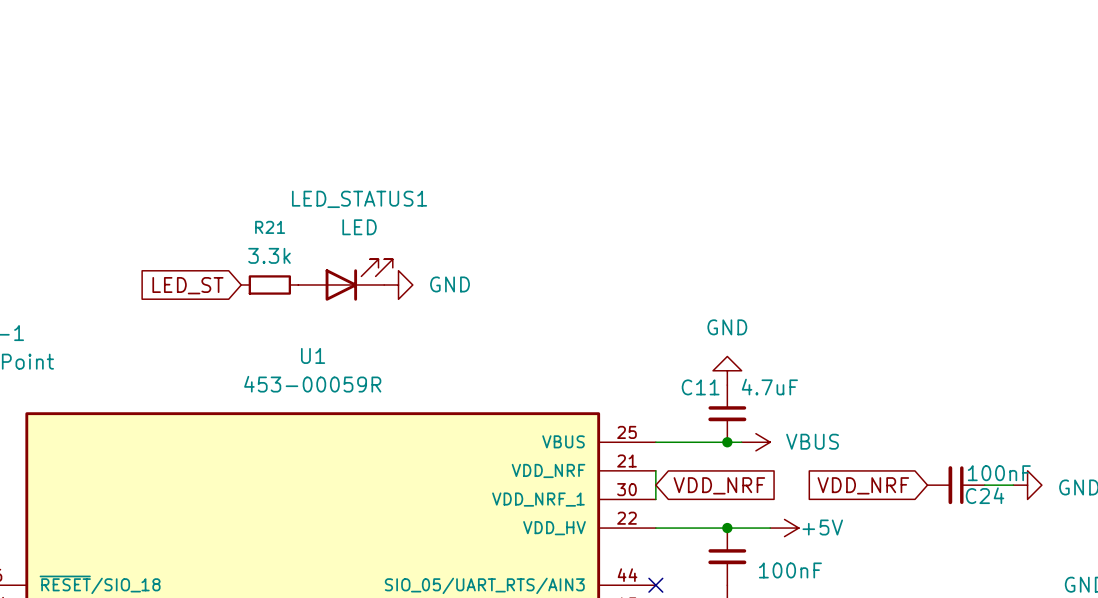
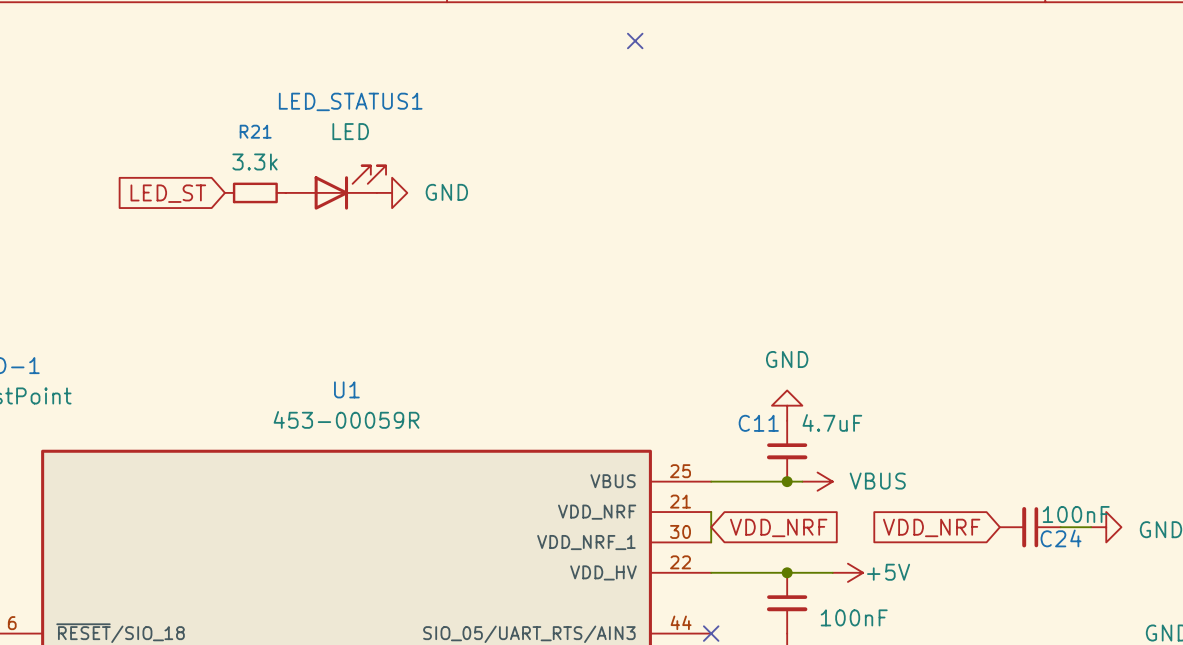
no-connect mark: none -> (635, 40)
LED_STATUS1 position: (345, 279) -> (335, 187)
R21 position: (269, 284) -> (255, 192)
power symbol position: GND (398, 284) -> GND (392, 192)
global label position: LED_ST (187, 285) -> LED_ST (168, 193)

